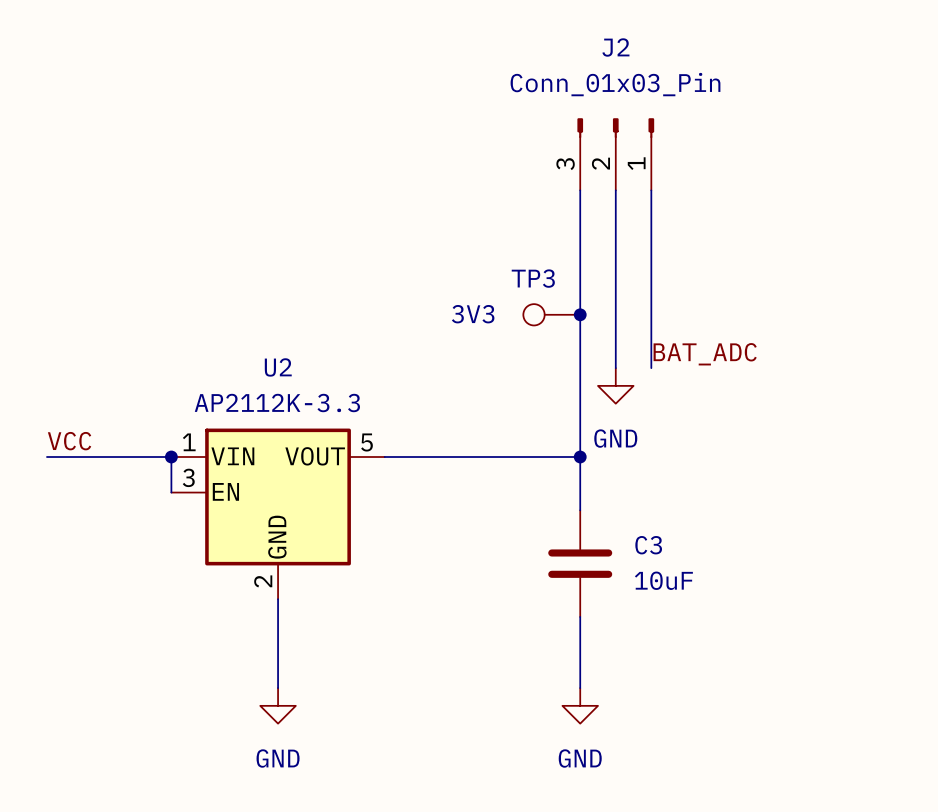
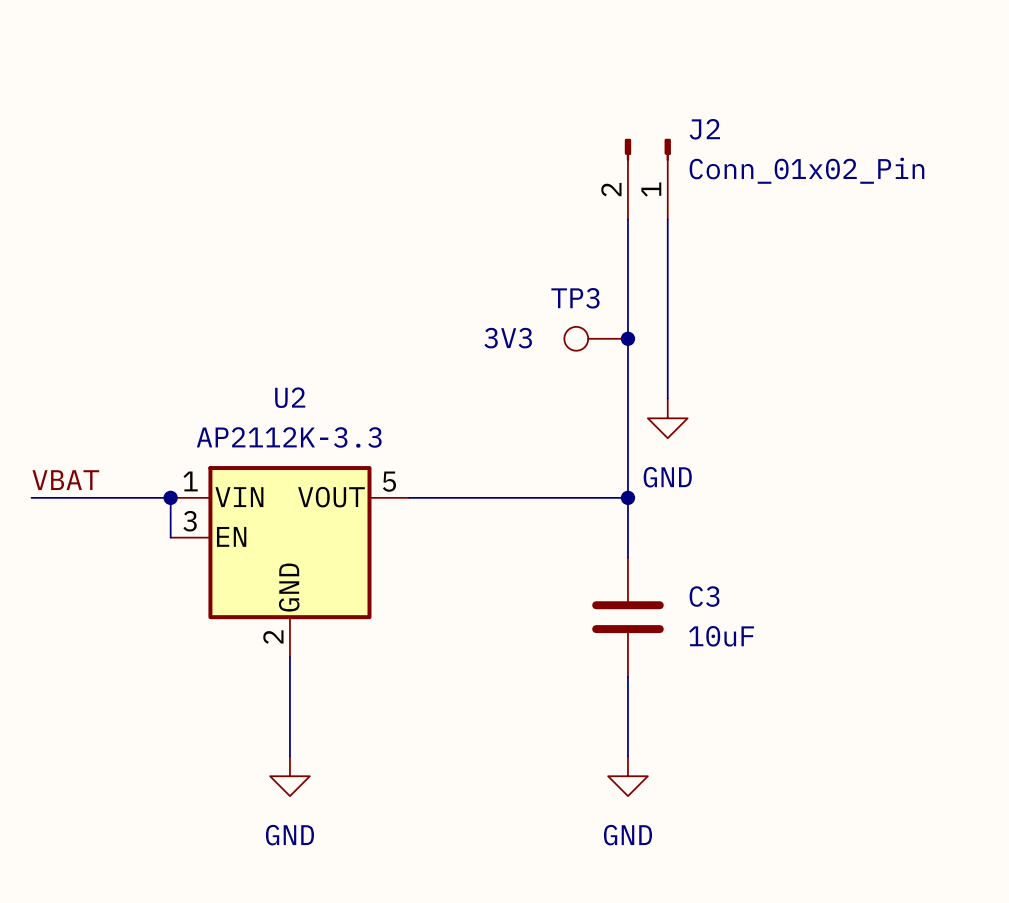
J2 name position: J2 (615, 47) -> J2 (704, 129)
J2 value: Conn_01x03_Pin (615, 84) -> Conn_01x02_Pin (806, 170)
J2 symbol: [577, 118, 655, 191] -> [624, 138, 671, 220]
wire: (651, 190) (651, 368) -> none
label: BAT_ADC (705, 354) -> none
label: VCC (69, 441) -> VBAT (65, 480)

